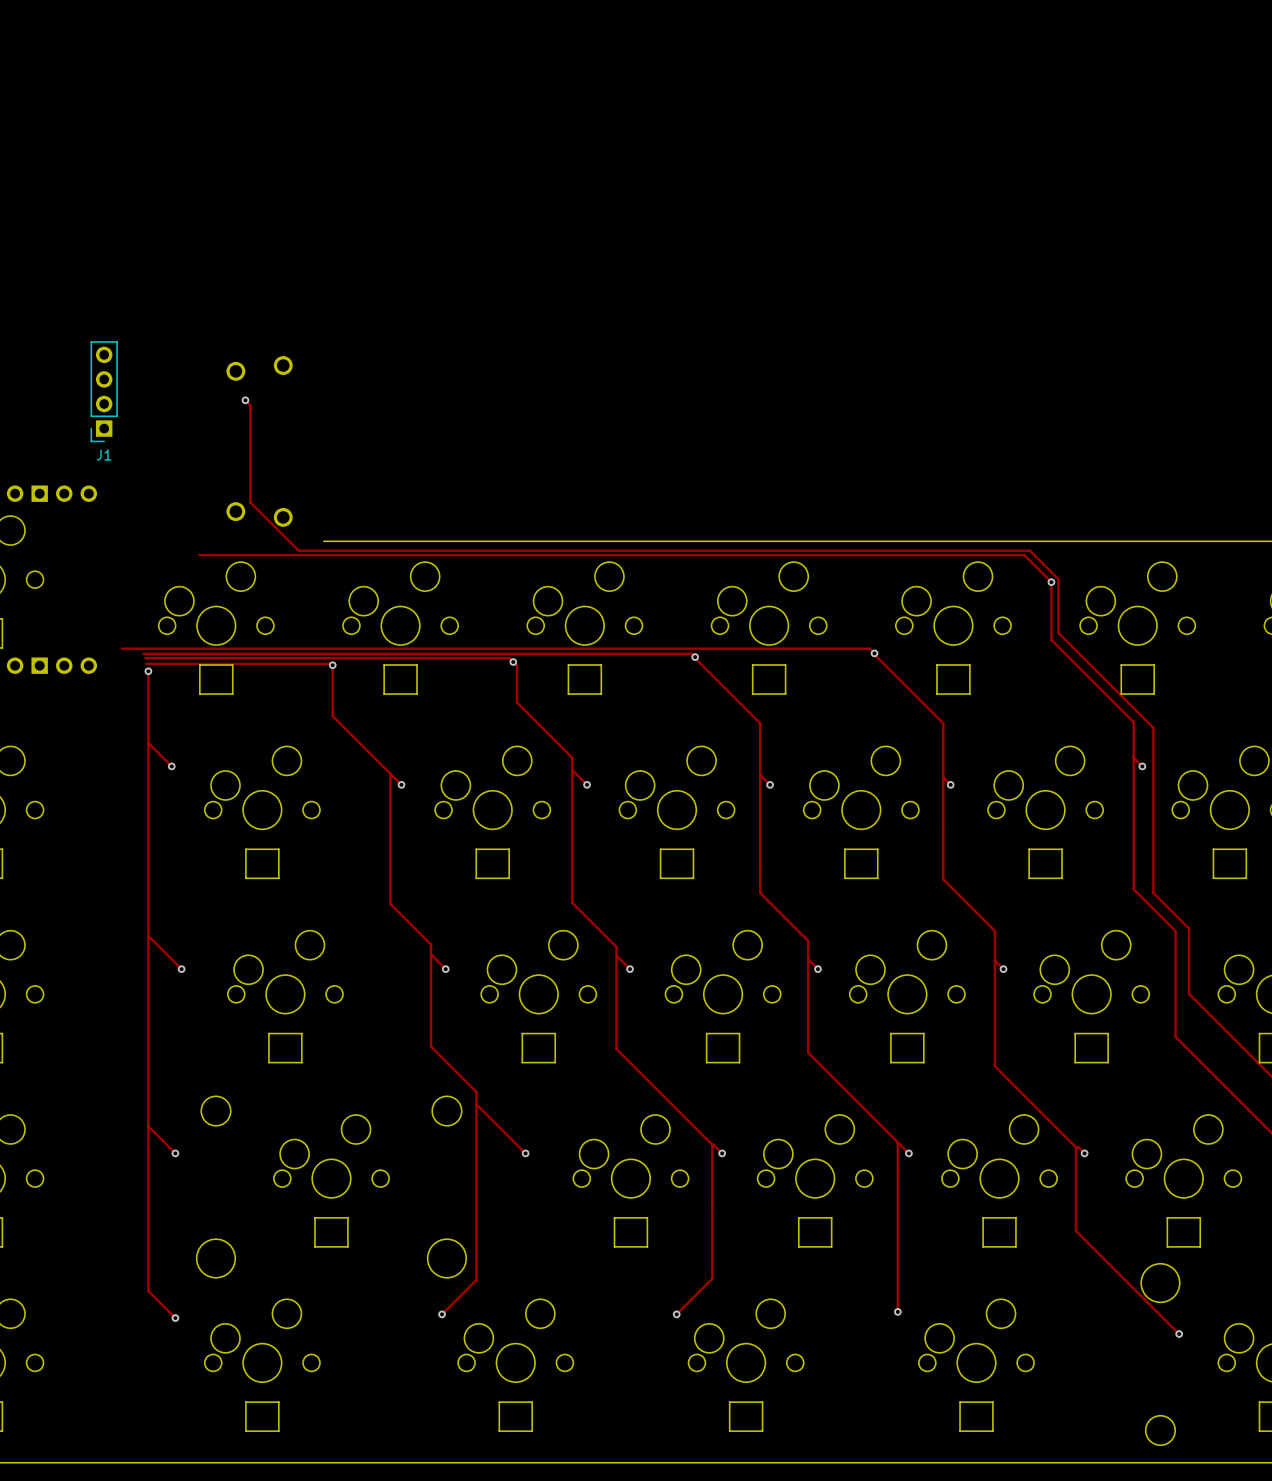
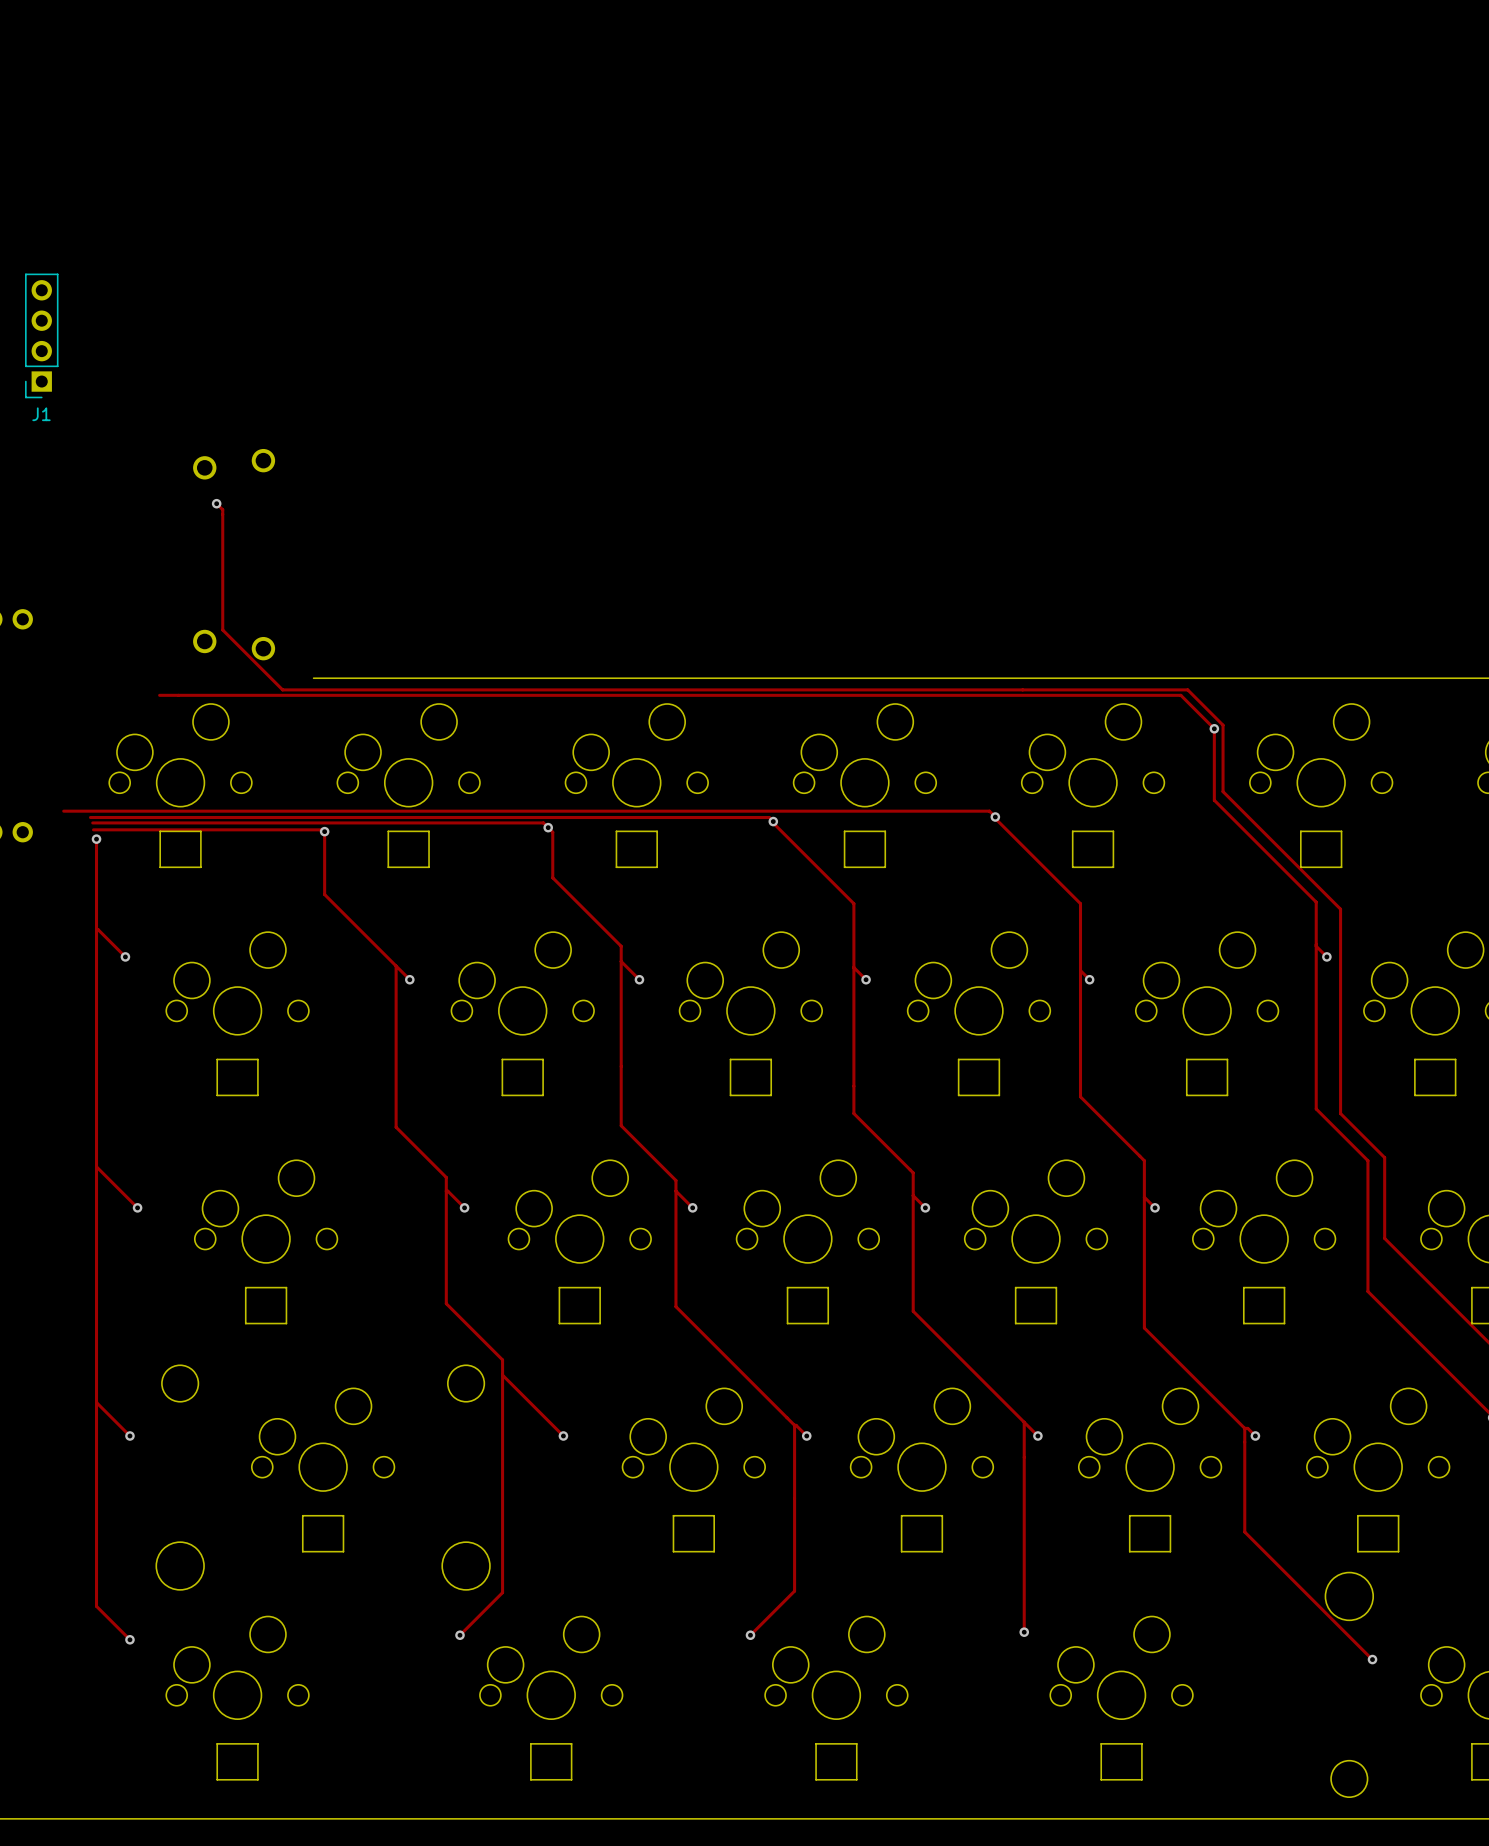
J1 position: (104, 391) -> (41, 335)

